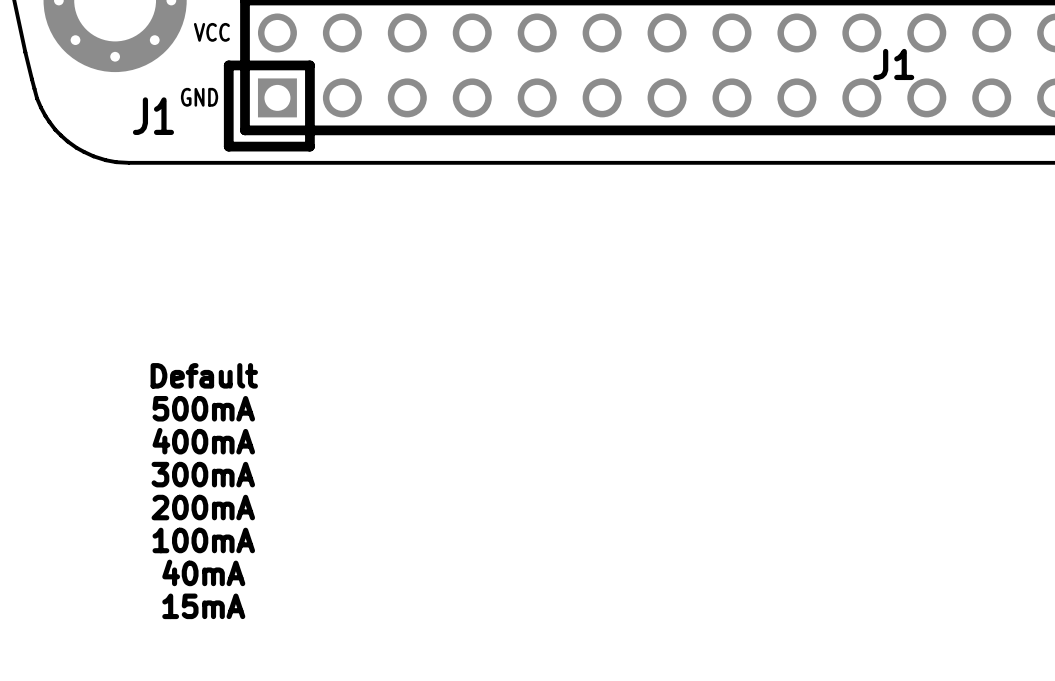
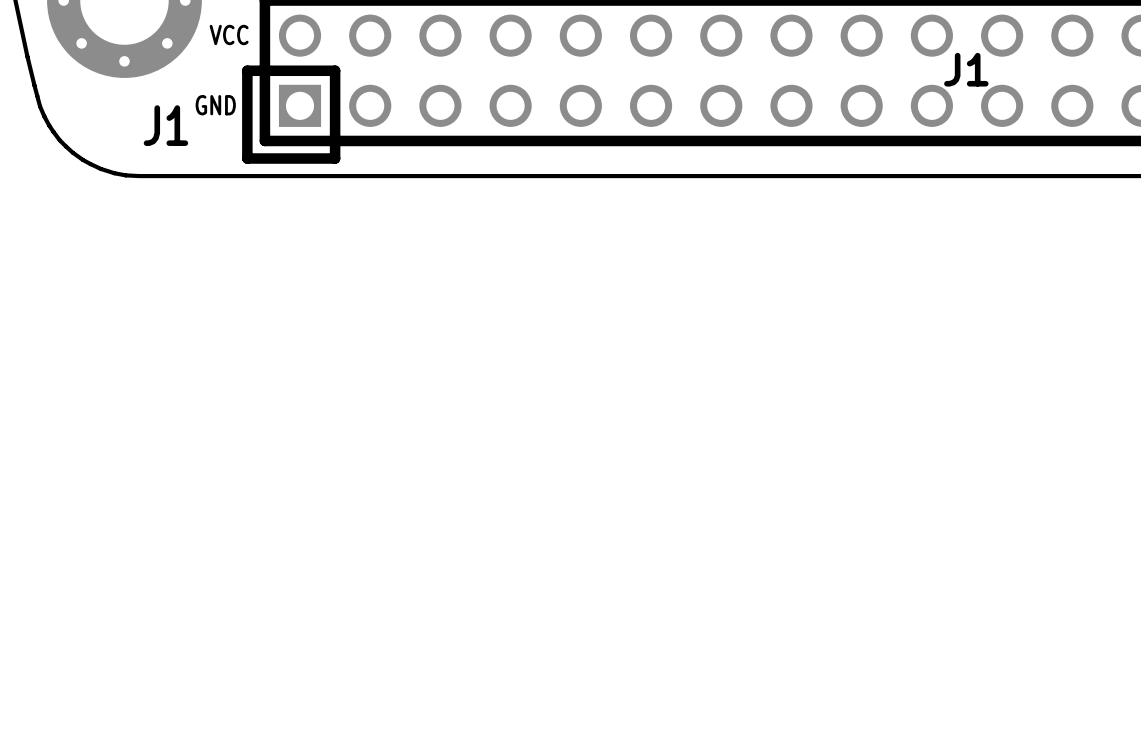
text: Default (204, 375) -> none
text: 500mA (203, 408) -> none
text: 400mA (203, 441) -> none
text: 300mA (203, 474) -> none
text: 200mA (203, 507) -> none
text: 100mA (203, 540) -> none
text: 40mA (203, 572) -> none
text: 15mA (203, 606) -> none

